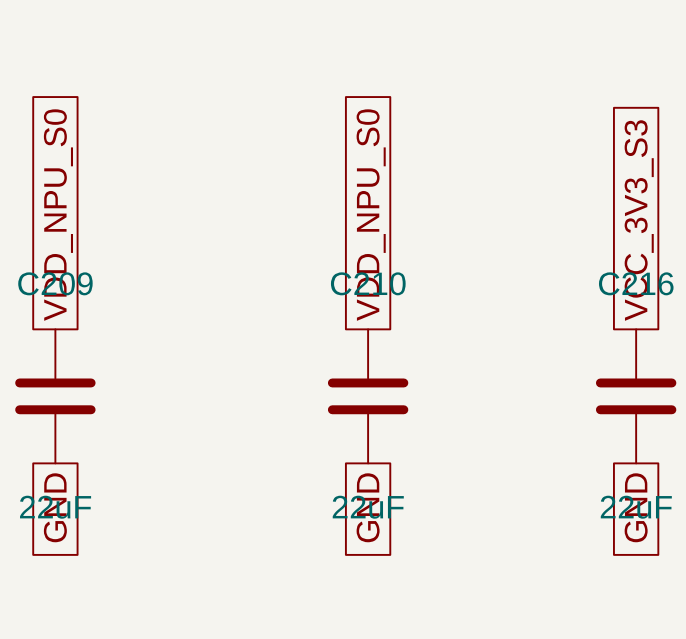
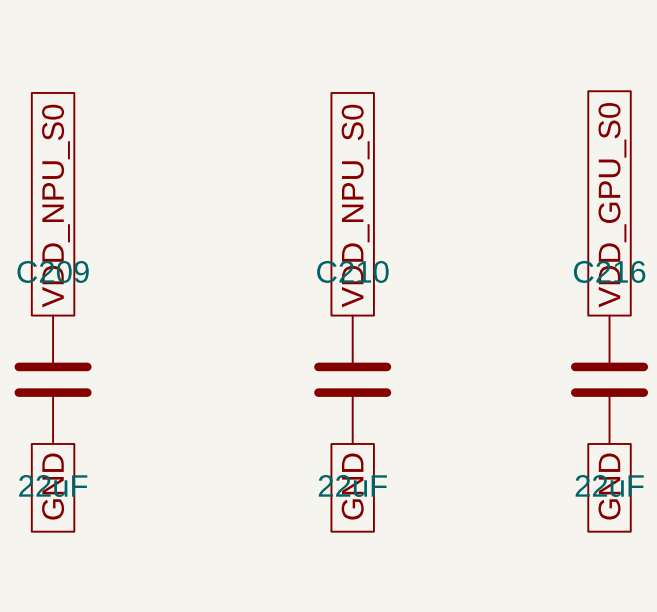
global label: VCC_3V3_S3 (639, 220) -> VDD_GPU_S0 (612, 205)

